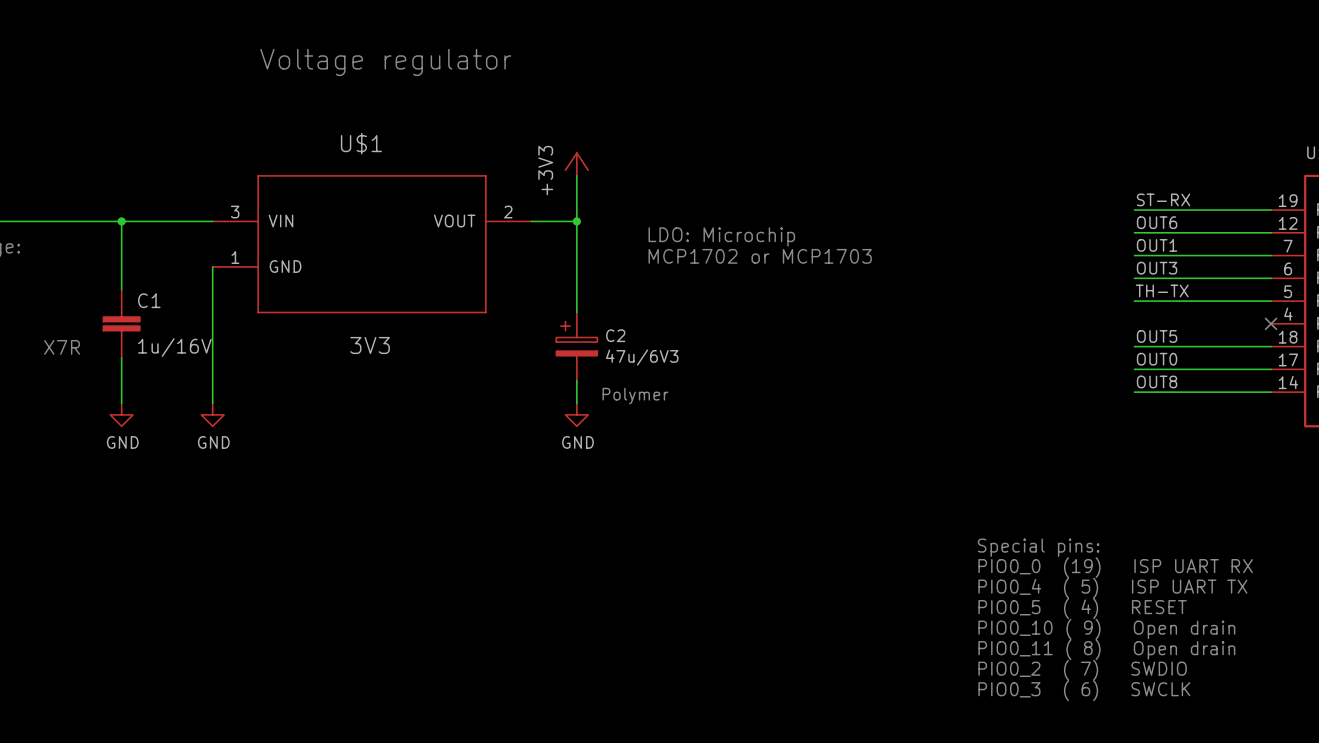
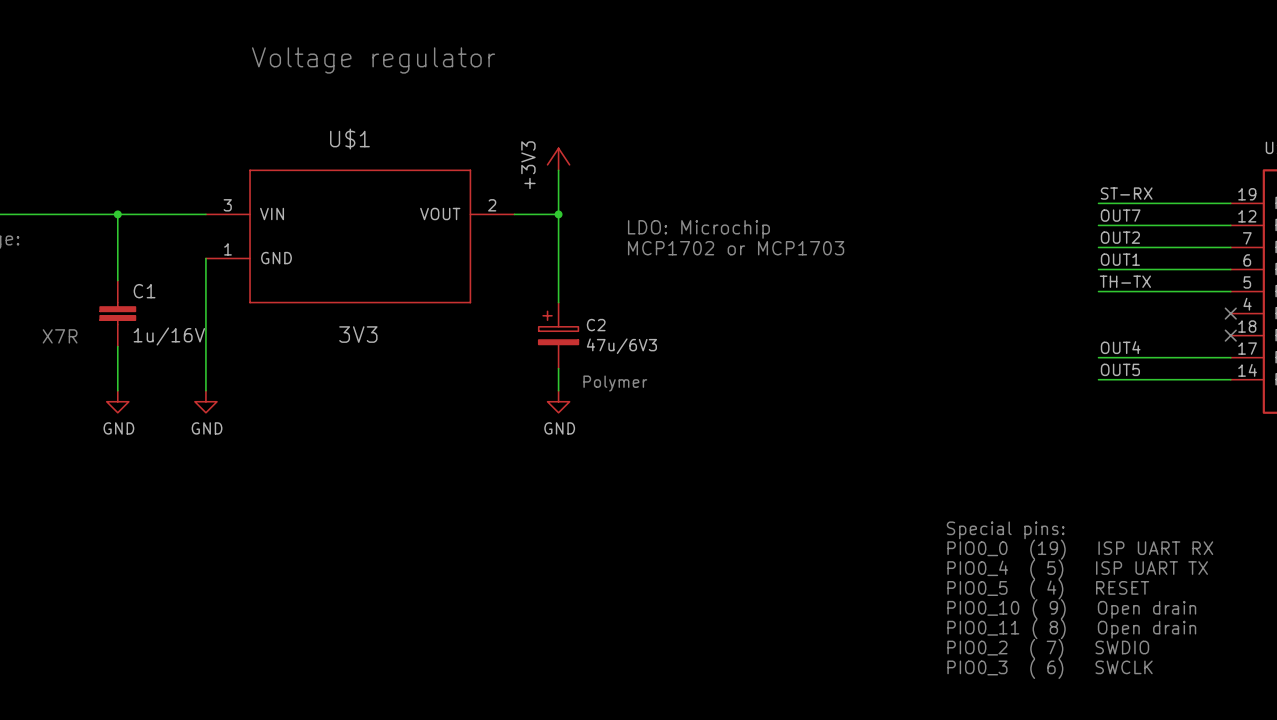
label: OUT6 (1157, 222) -> OUT7 (1120, 215)
label: OUT1 (1157, 245) -> OUT2 (1120, 237)
label: OUT3 (1157, 268) -> OUT1 (1120, 259)
label: OUT5 (1157, 336) -> none
wire: (1134, 346) (1271, 346) -> none
no-connect mark: none -> (1230, 335)
label: OUT0 (1157, 359) -> OUT4 (1120, 347)
label: OUT8 (1157, 381) -> OUT5 (1120, 369)

